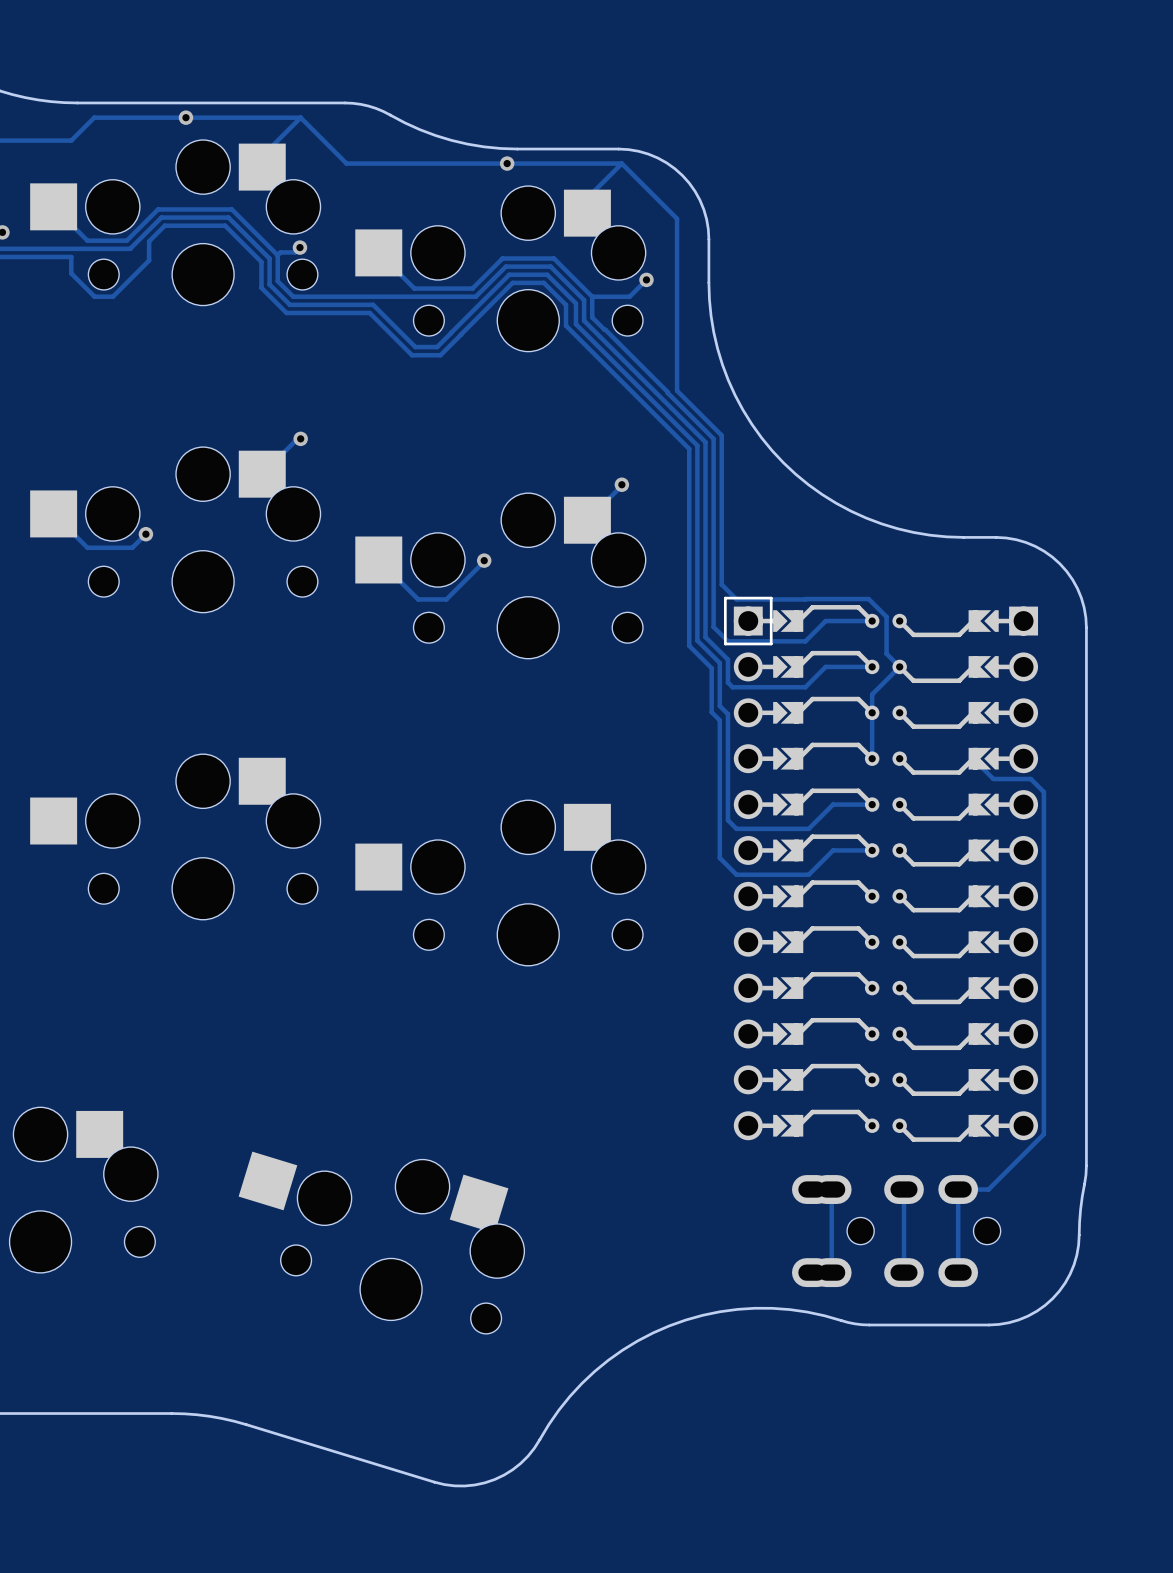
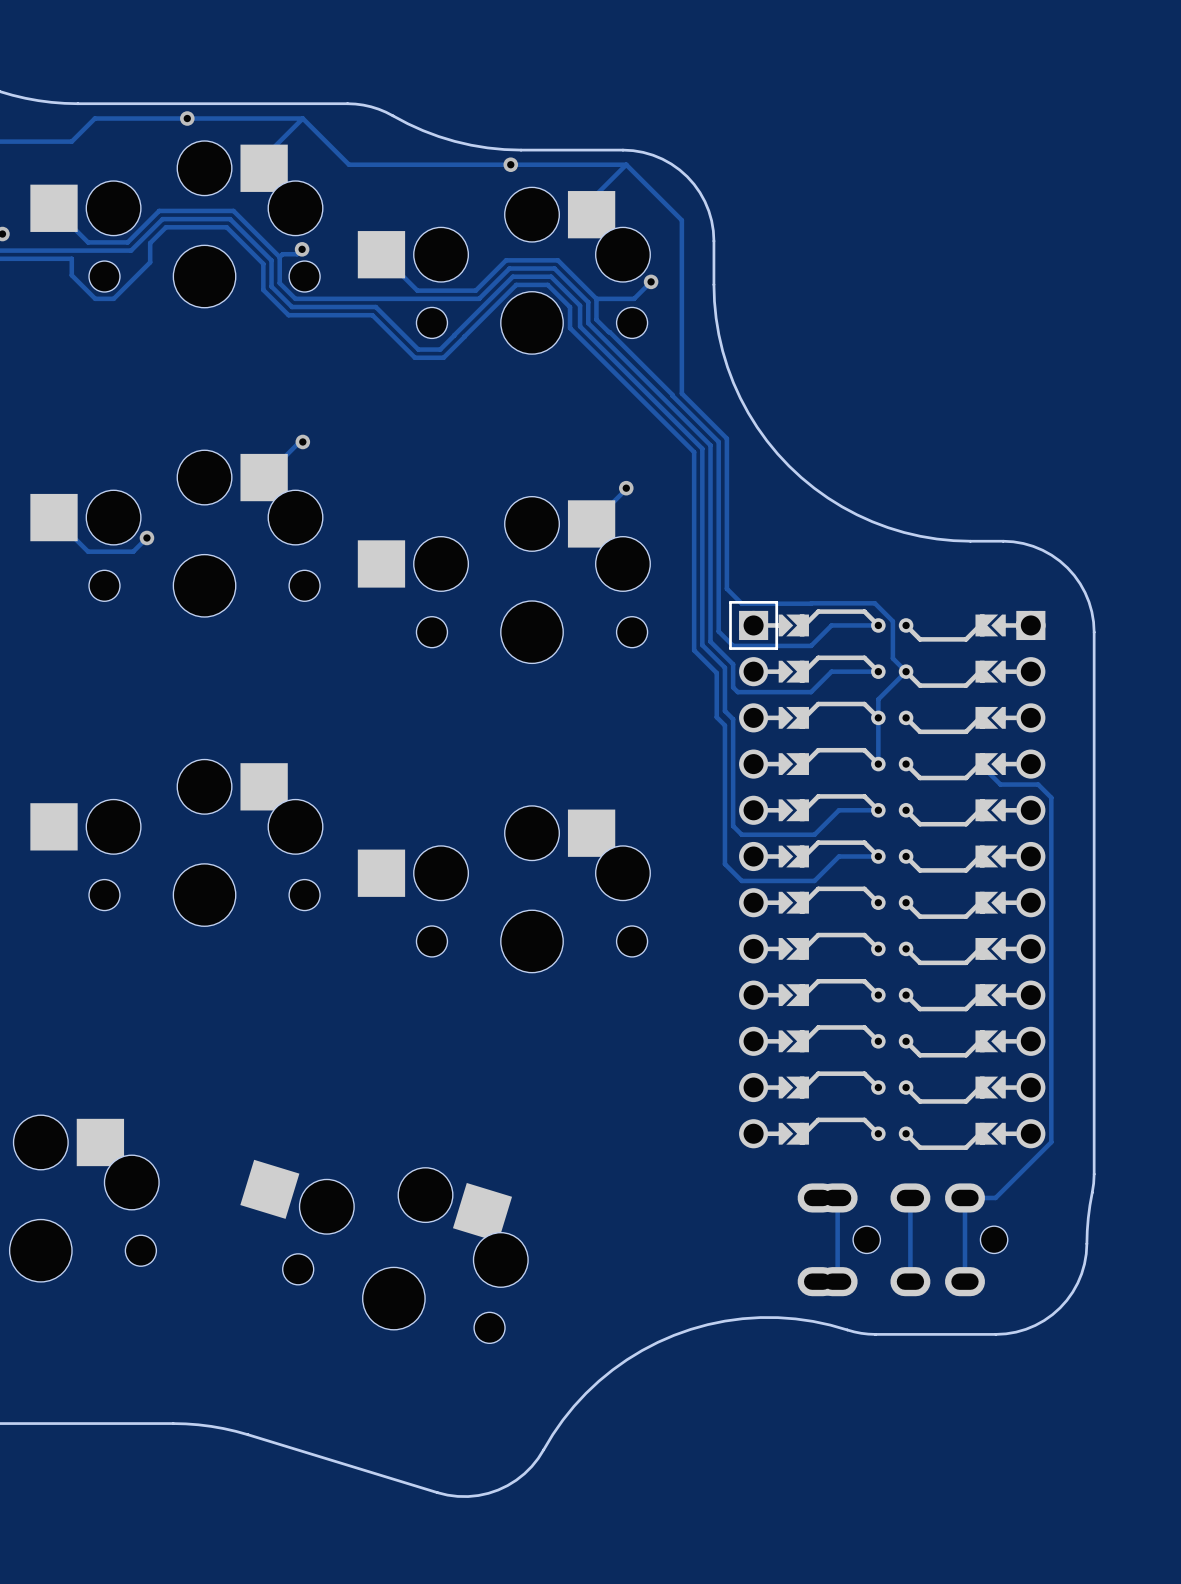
track: (378, 559) (418, 599) (446, 599) (484, 560) -> none
via: (484, 560) -> none

